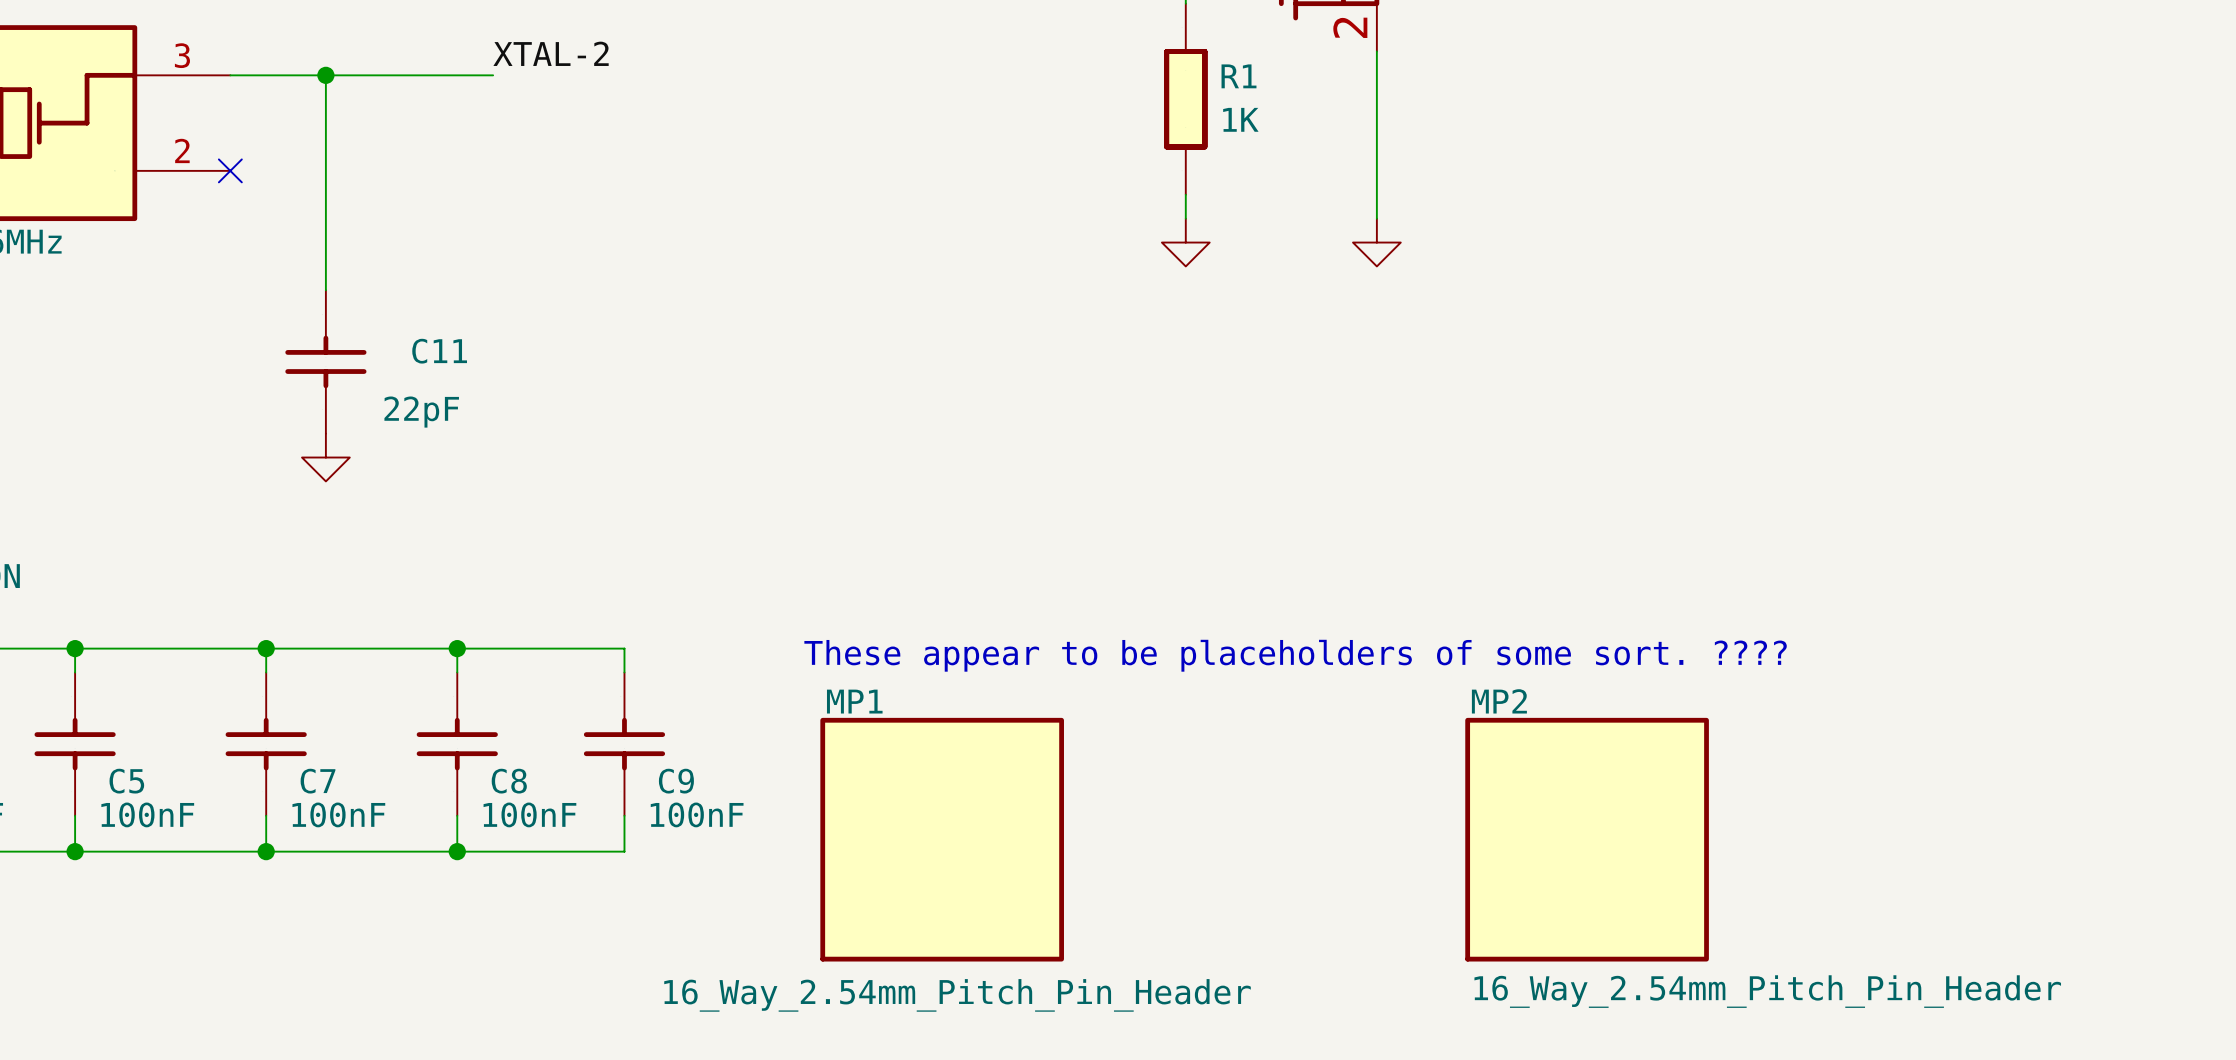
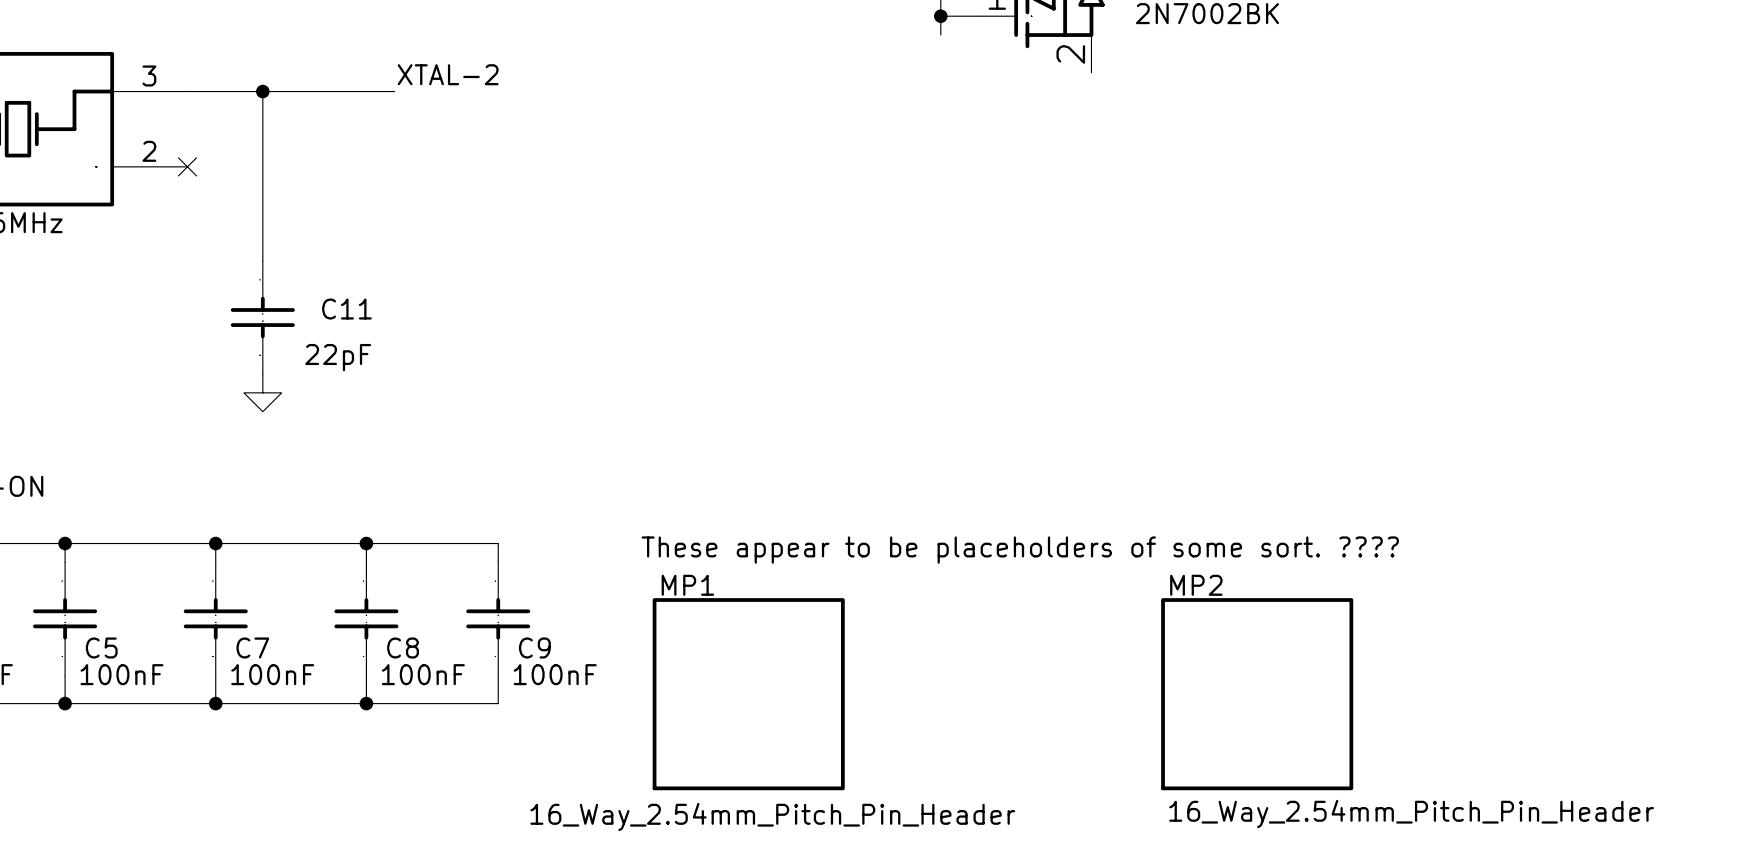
wire: (1376, 51) (1376, 218) -> none
R1: (1185, 99) -> none
wire: (1185, 194) (1185, 218) -> none
power symbol: (1185, 242) -> none
power symbol: (1376, 242) -> none

